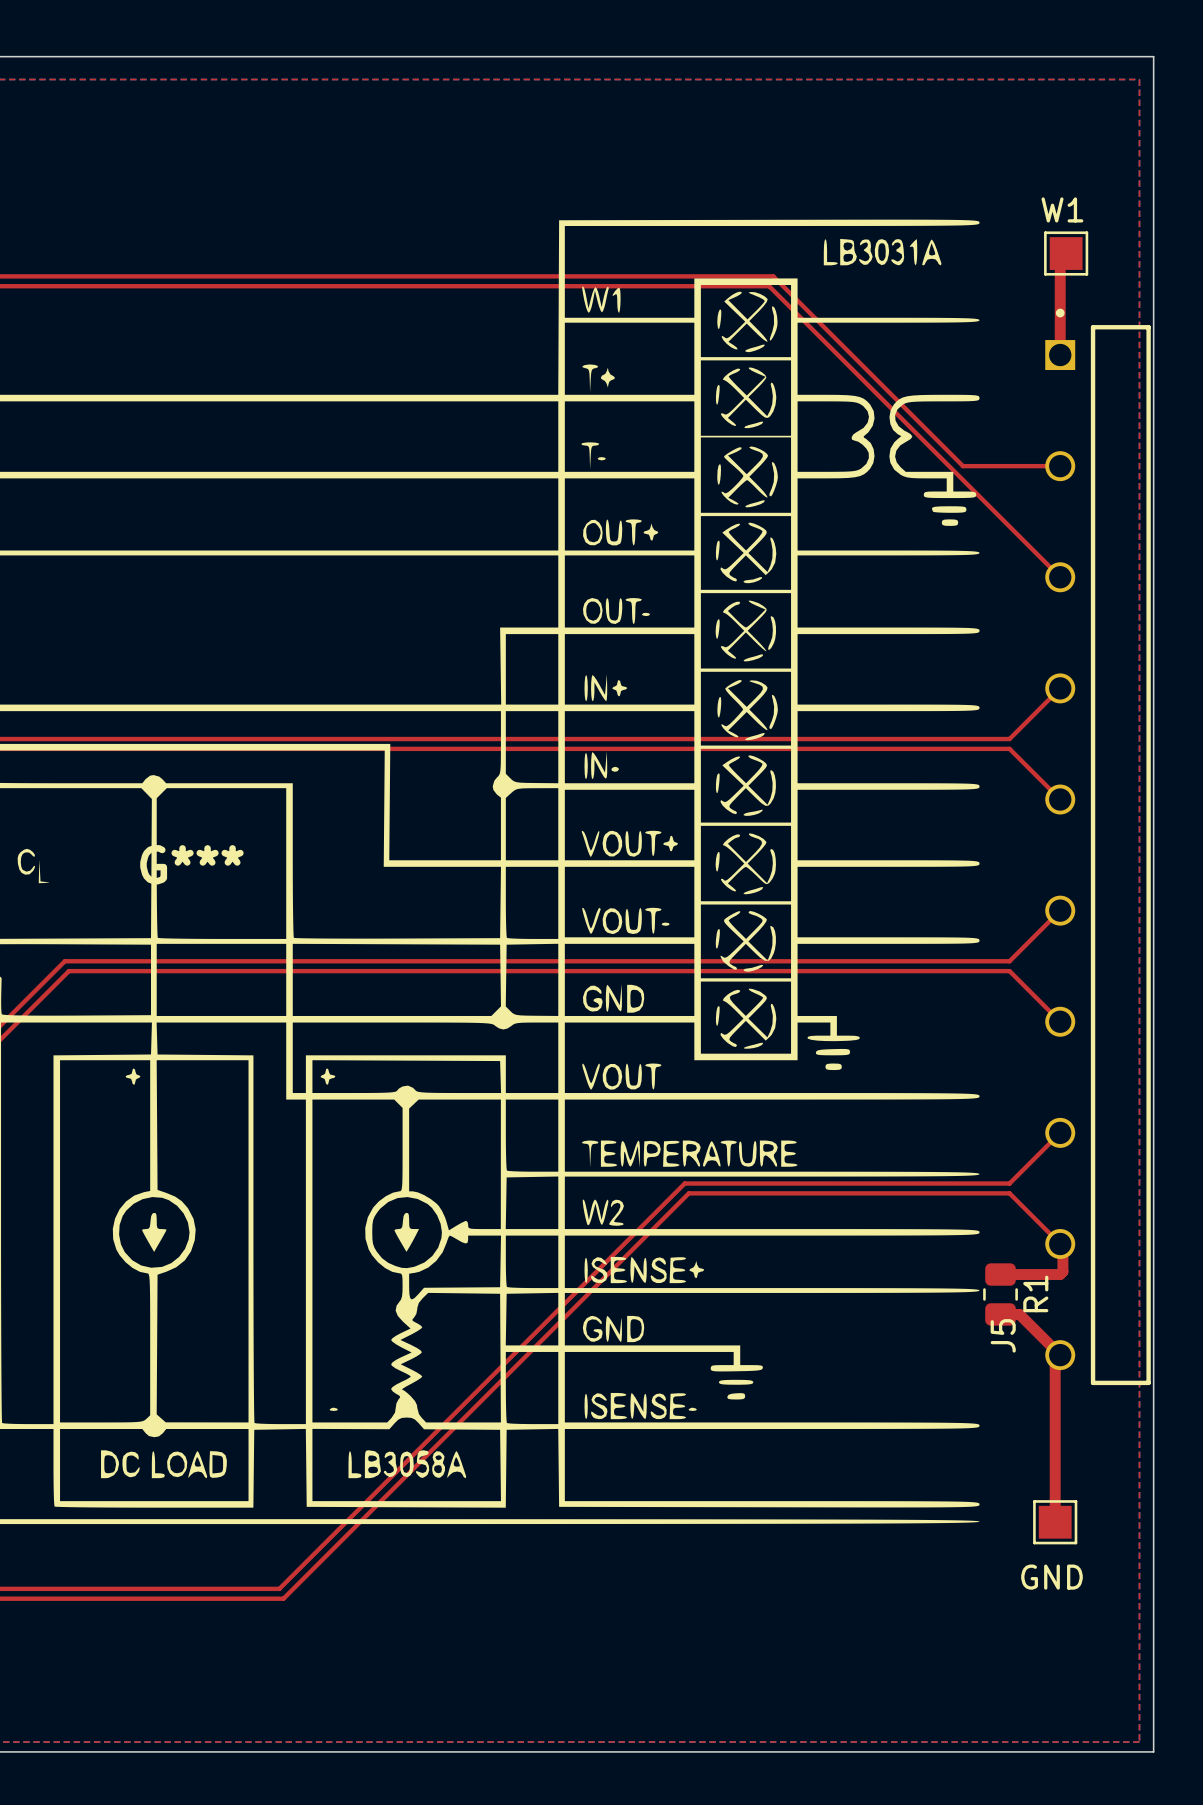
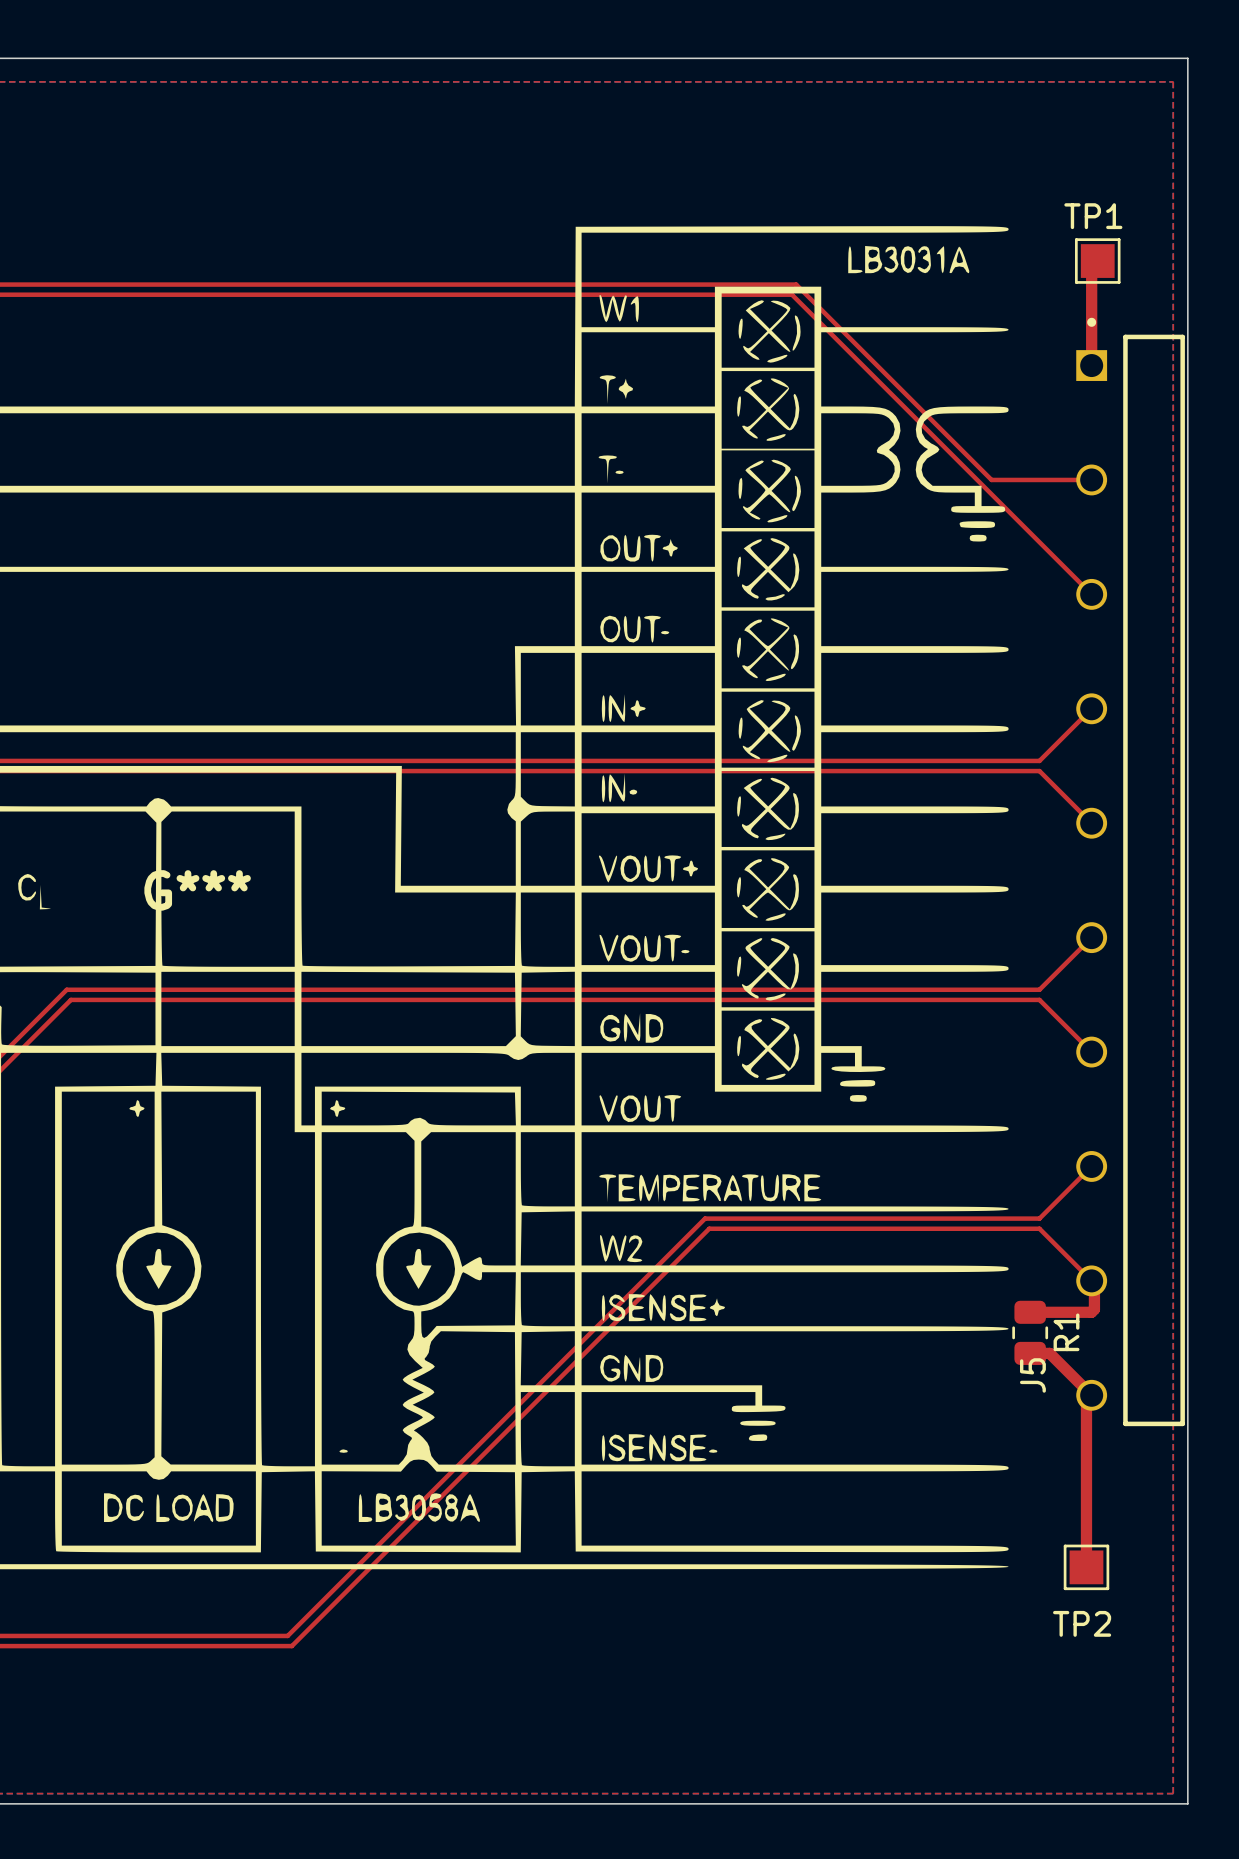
W1 name: W1 (1062, 209) -> TP1 (1093, 216)
GND name: GND (1051, 1577) -> TP2 (1082, 1623)

